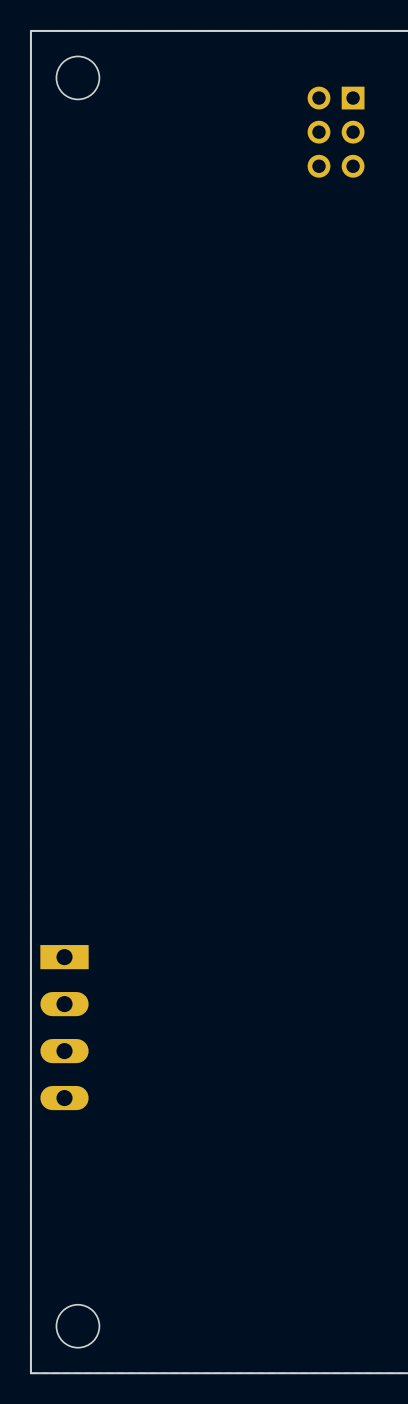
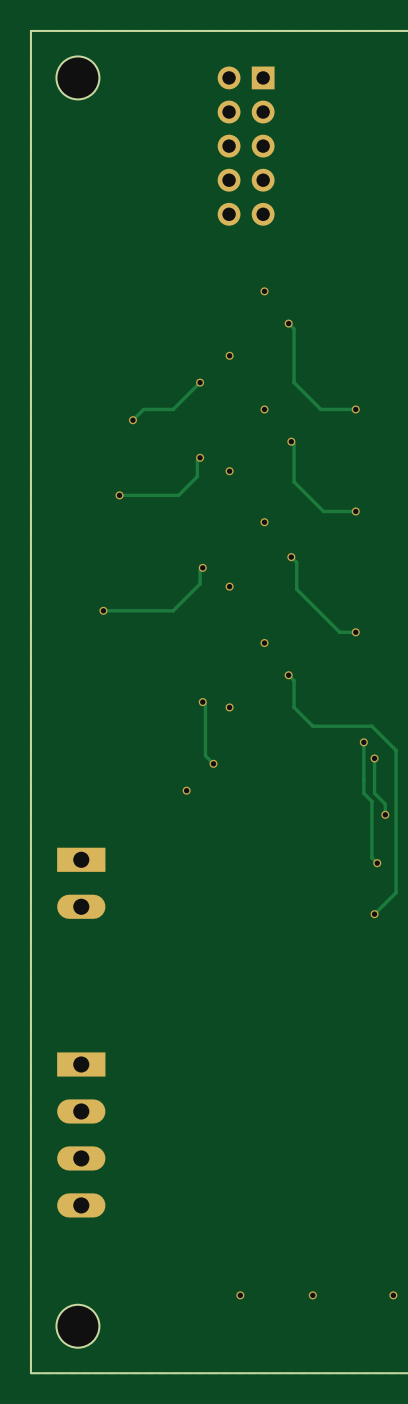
part: (336, 132) -> none
part: none -> (246, 146)
via: none -> (264, 291)
track: none -> (288, 323) (294, 328) (294, 382) (320, 409) (355, 409)
via: none -> (288, 323)
via: none -> (229, 355)
track: none -> (200, 382) (173, 409) (143, 409) (132, 420)
via: none -> (200, 382)
via: none -> (264, 409)
via: none -> (355, 409)
via: none -> (132, 420)
track: none -> (291, 441) (294, 444) (294, 481) (323, 511) (355, 511)
via: none -> (291, 441)
track: none -> (200, 457) (197, 460) (197, 476) (178, 495) (119, 495)
via: none -> (200, 457)
via: none -> (229, 471)
via: none -> (119, 495)
via: none -> (355, 511)
via: none -> (264, 522)
track: none -> (291, 557) (296, 562) (296, 589) (339, 632) (355, 632)
via: none -> (291, 557)
track: none -> (202, 567) (200, 570) (200, 583) (173, 610) (103, 610)
via: none -> (202, 567)
via: none -> (229, 586)
via: none -> (103, 610)
via: none -> (355, 632)
via: none -> (264, 643)
track: none -> (288, 675) (294, 680) (294, 707) (312, 726) (371, 726) (396, 750) (396, 892) (374, 914)
via: none -> (288, 675)
track: none -> (202, 702) (205, 704) (205, 755) (213, 763)
via: none -> (202, 702)
via: none -> (229, 707)
track: none -> (363, 742) (363, 793) (371, 801) (371, 857) (377, 863)
via: none -> (363, 742)
track: none -> (374, 758) (374, 793) (385, 804) (385, 814)
via: none -> (374, 758)
via: none -> (213, 763)
via: none -> (186, 790)
via: none -> (385, 814)
via: none -> (377, 863)
part: none -> (81, 883)
via: none -> (374, 914)
part position: (64, 1027) -> (81, 1134)
via: none -> (240, 1295)
via: none -> (312, 1295)
via: none -> (393, 1295)

